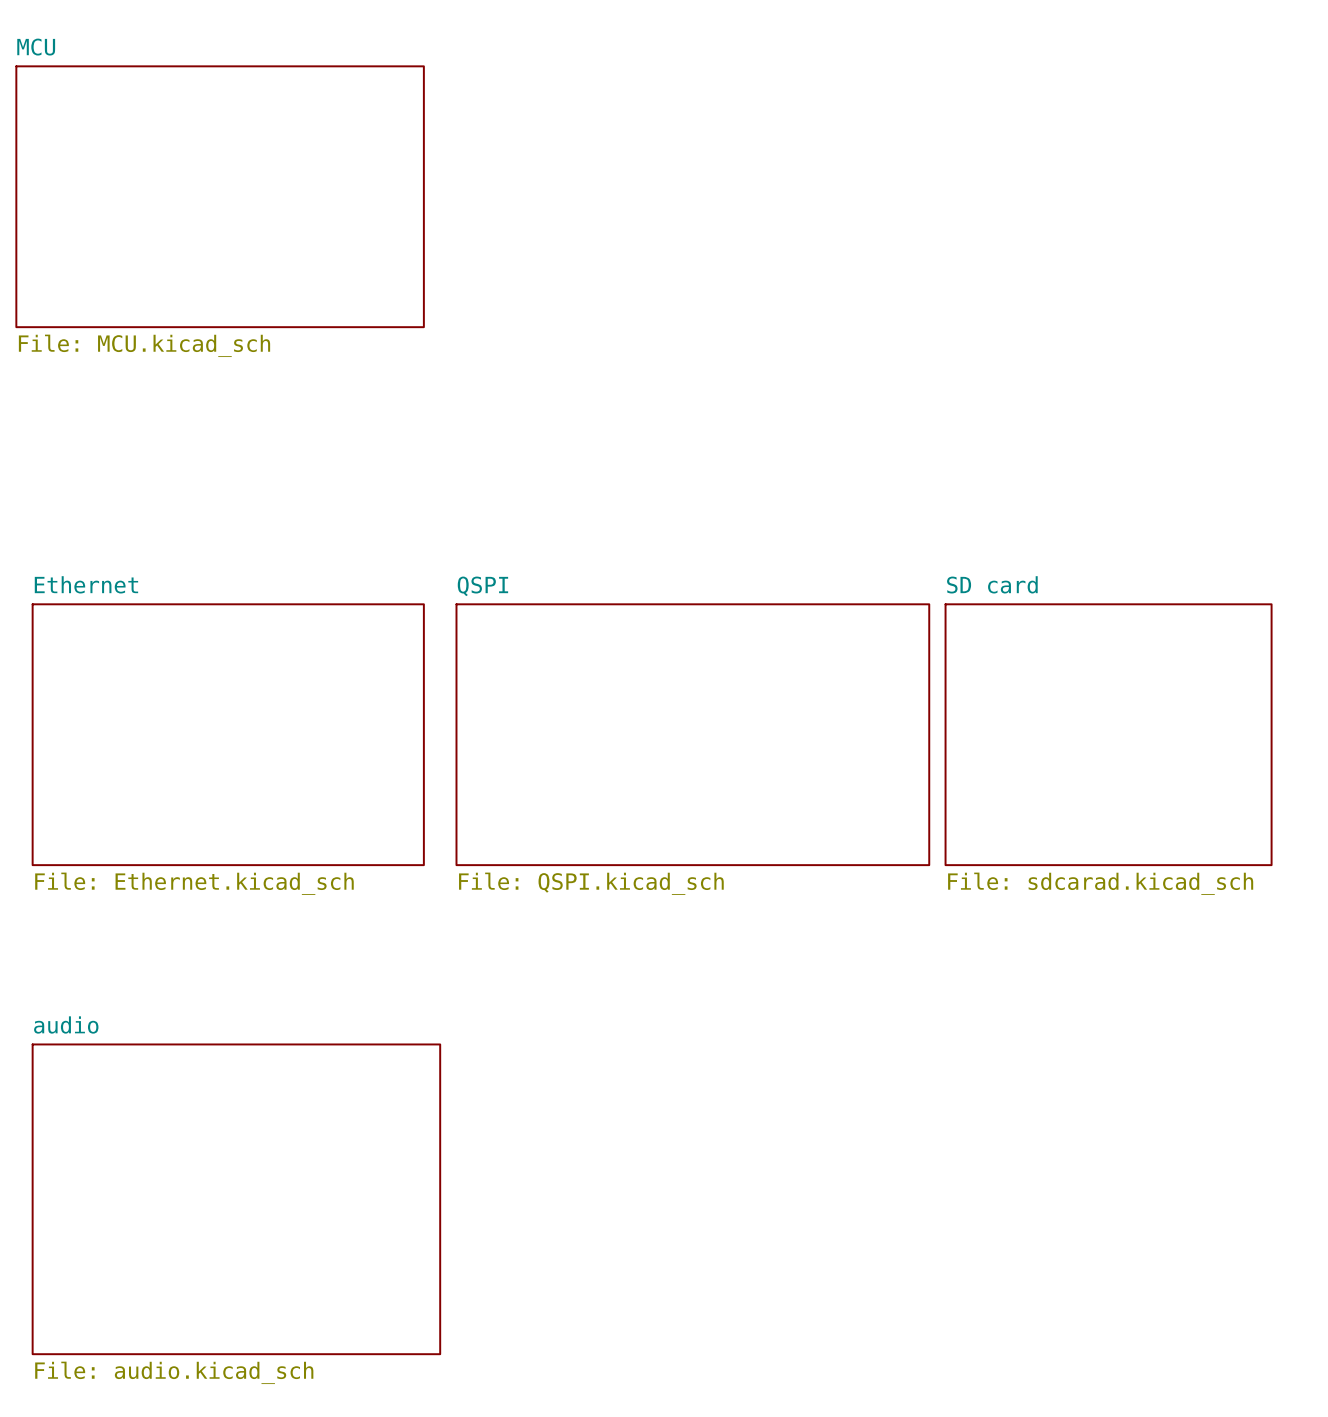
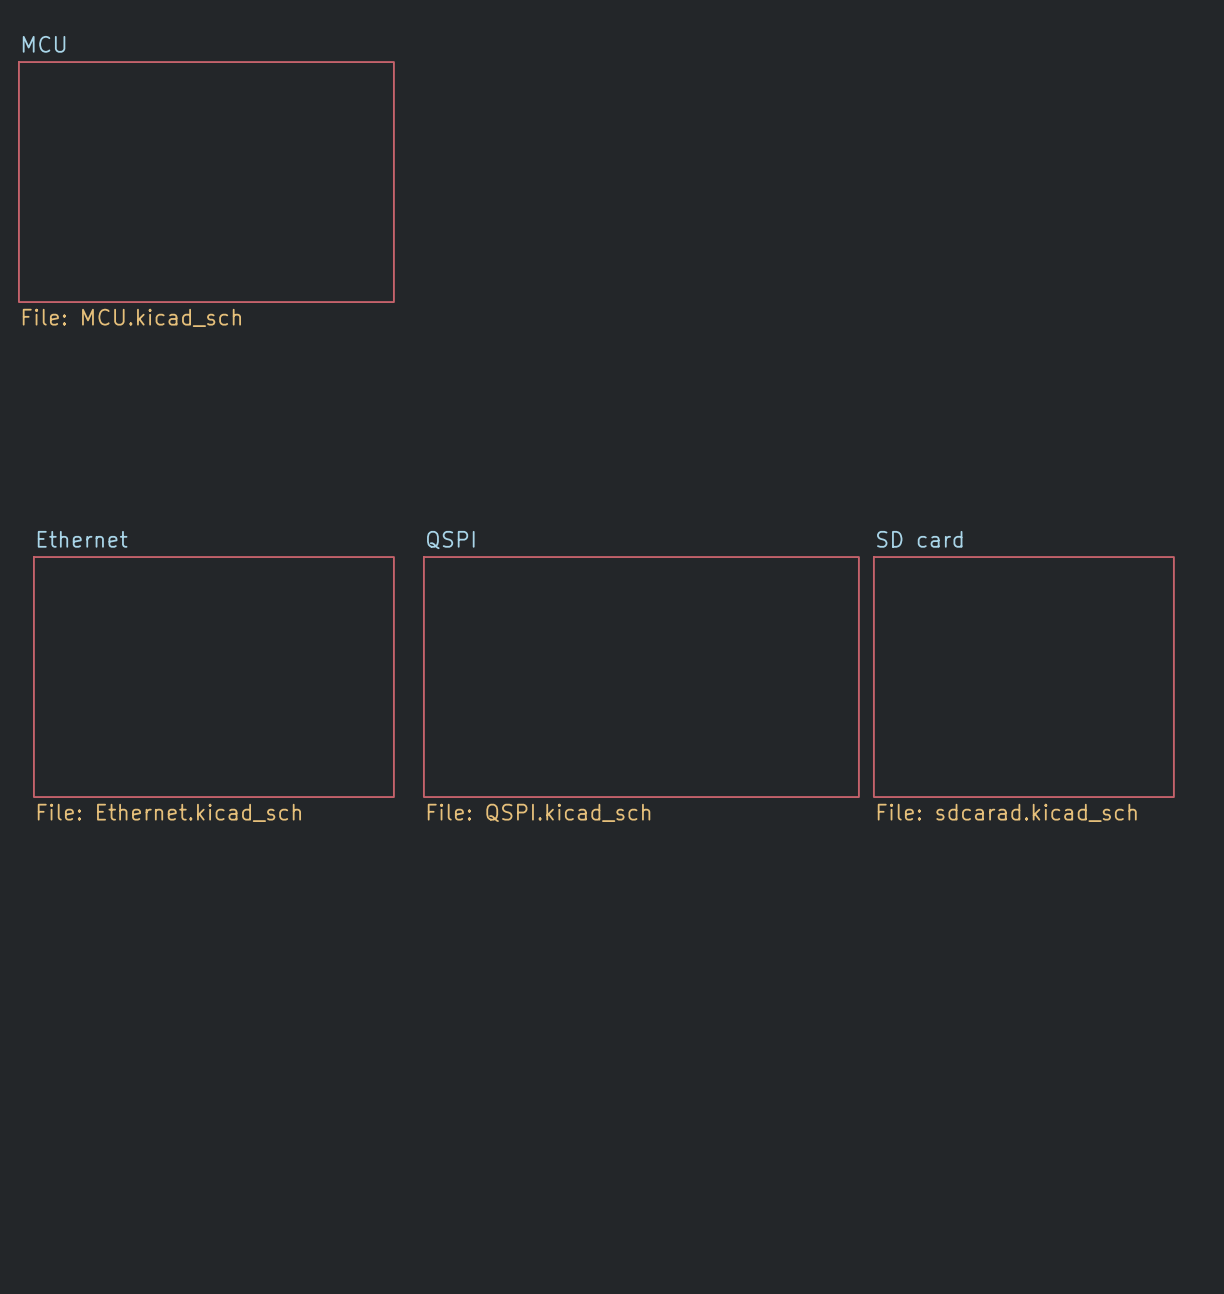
sheet audio: File: audio.kicad_sch (236, 1199) -> none

